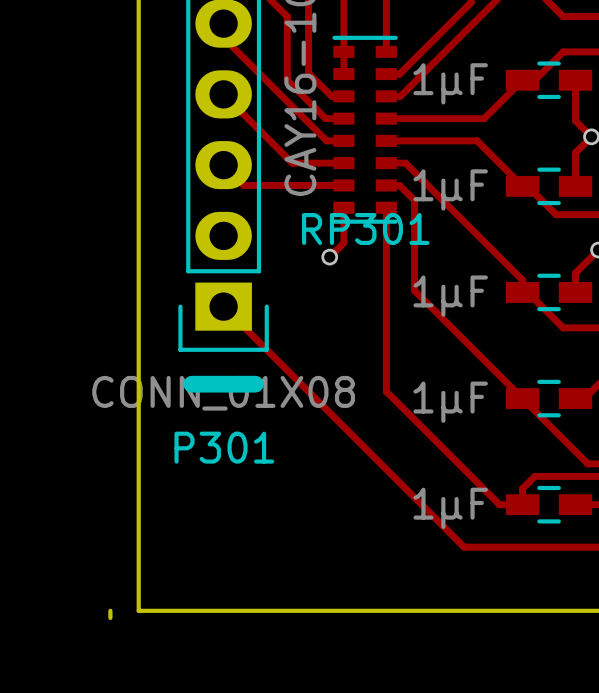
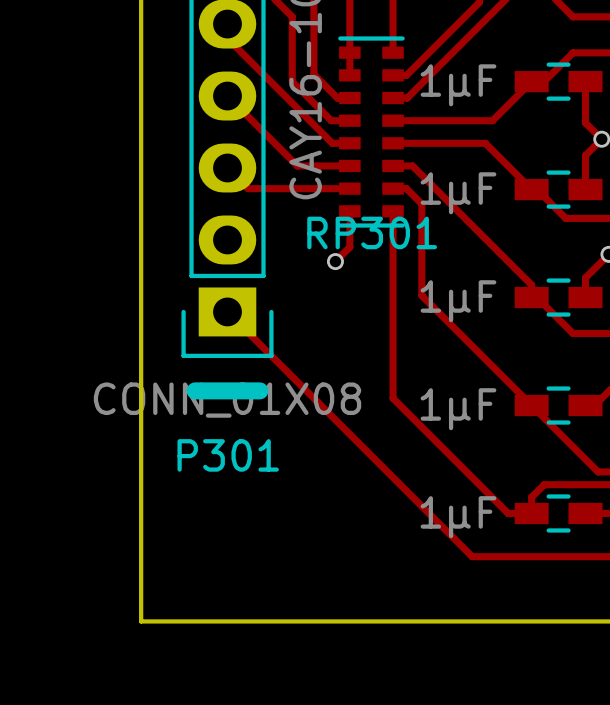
board edge: (110, 610) (110, 617) -> none

